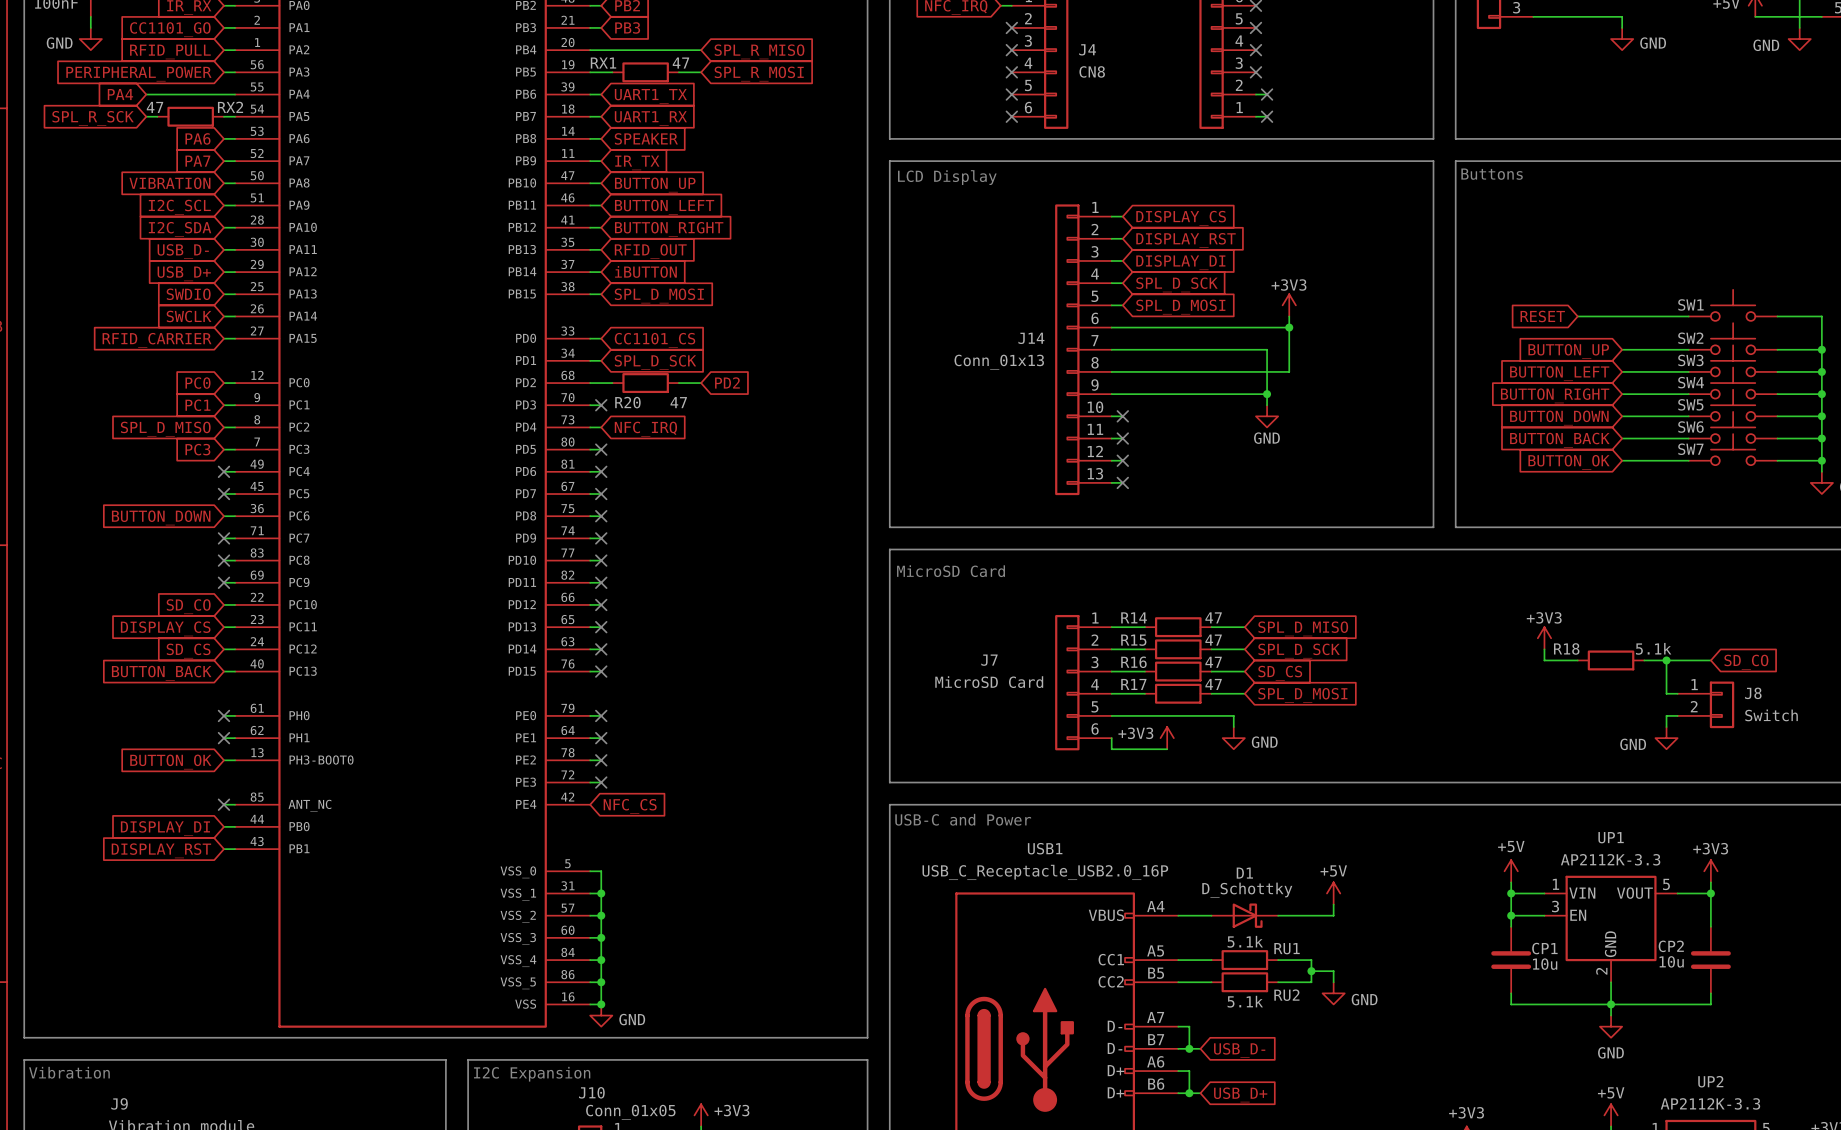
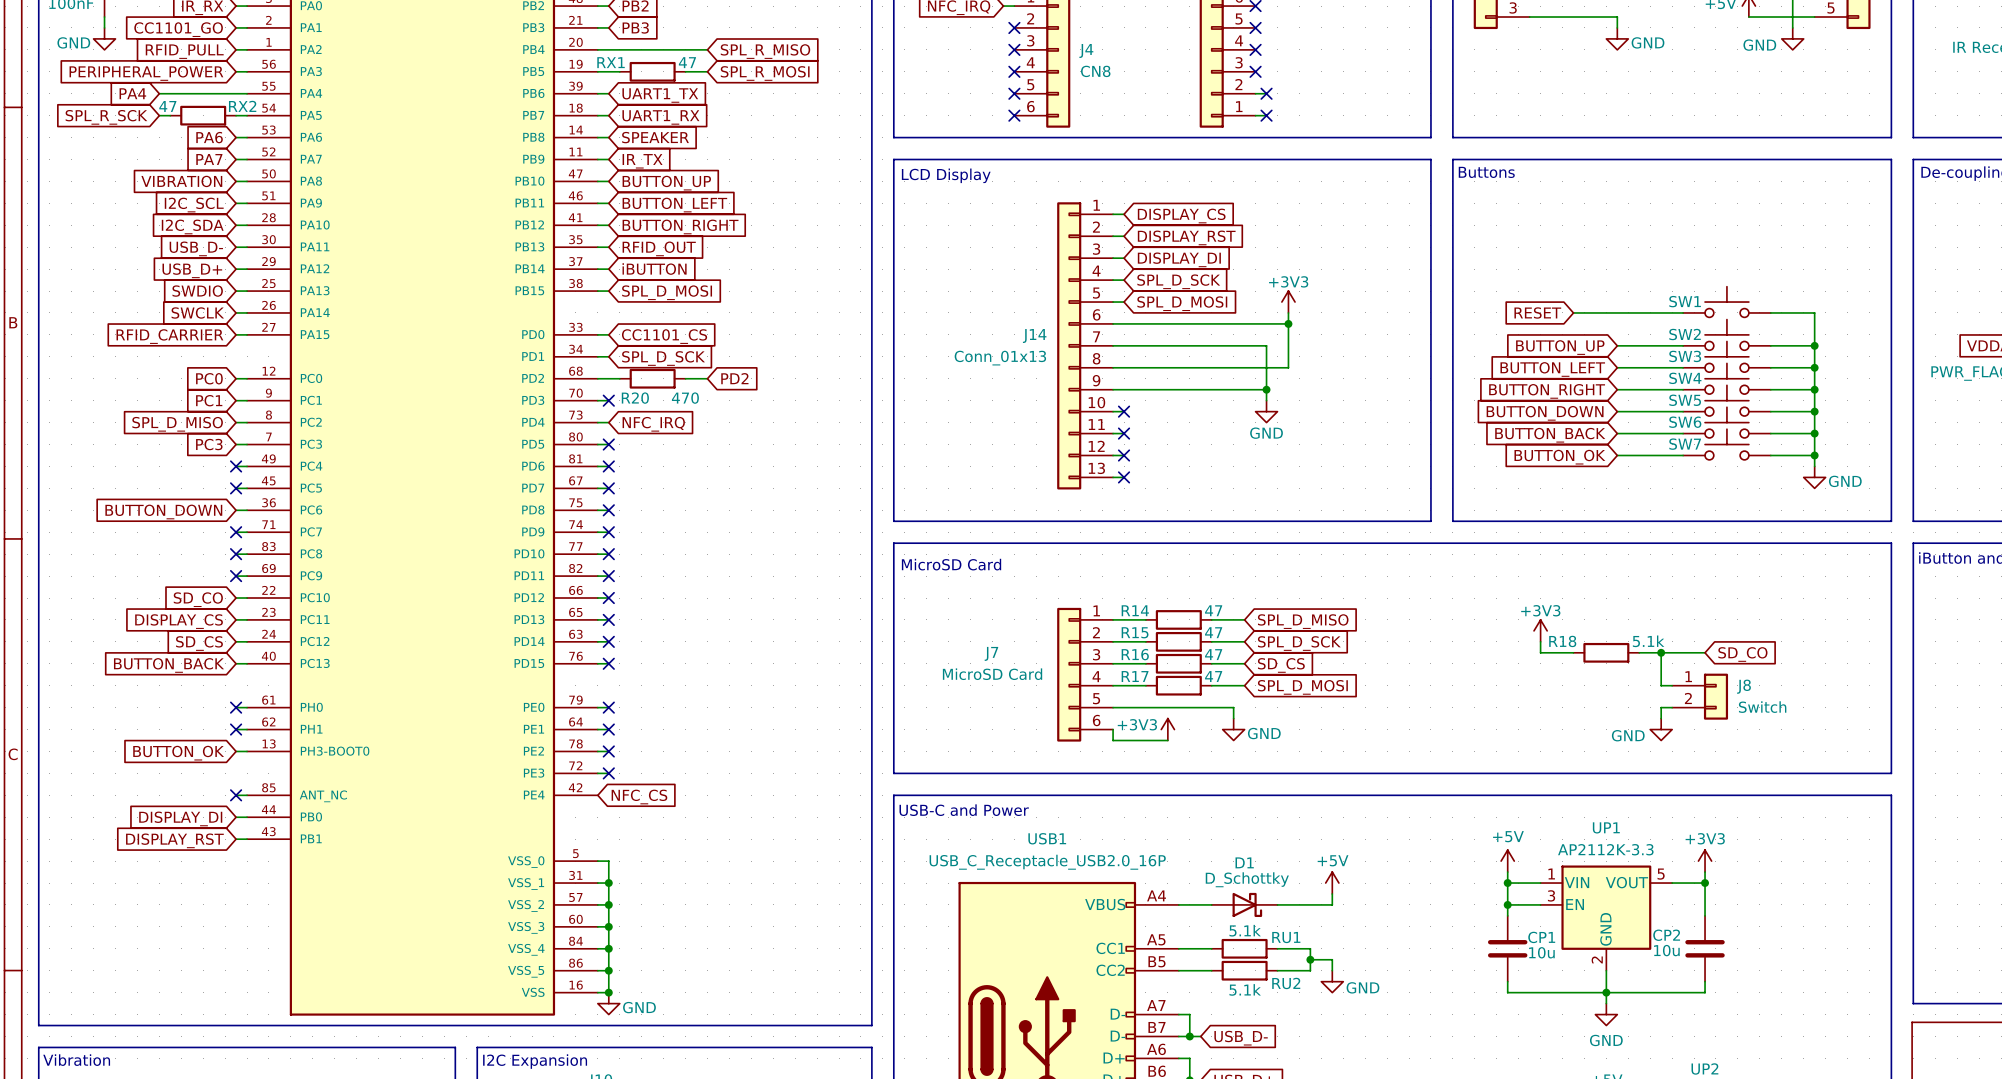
R20 value: 47 (678, 402) -> 470 (685, 398)

